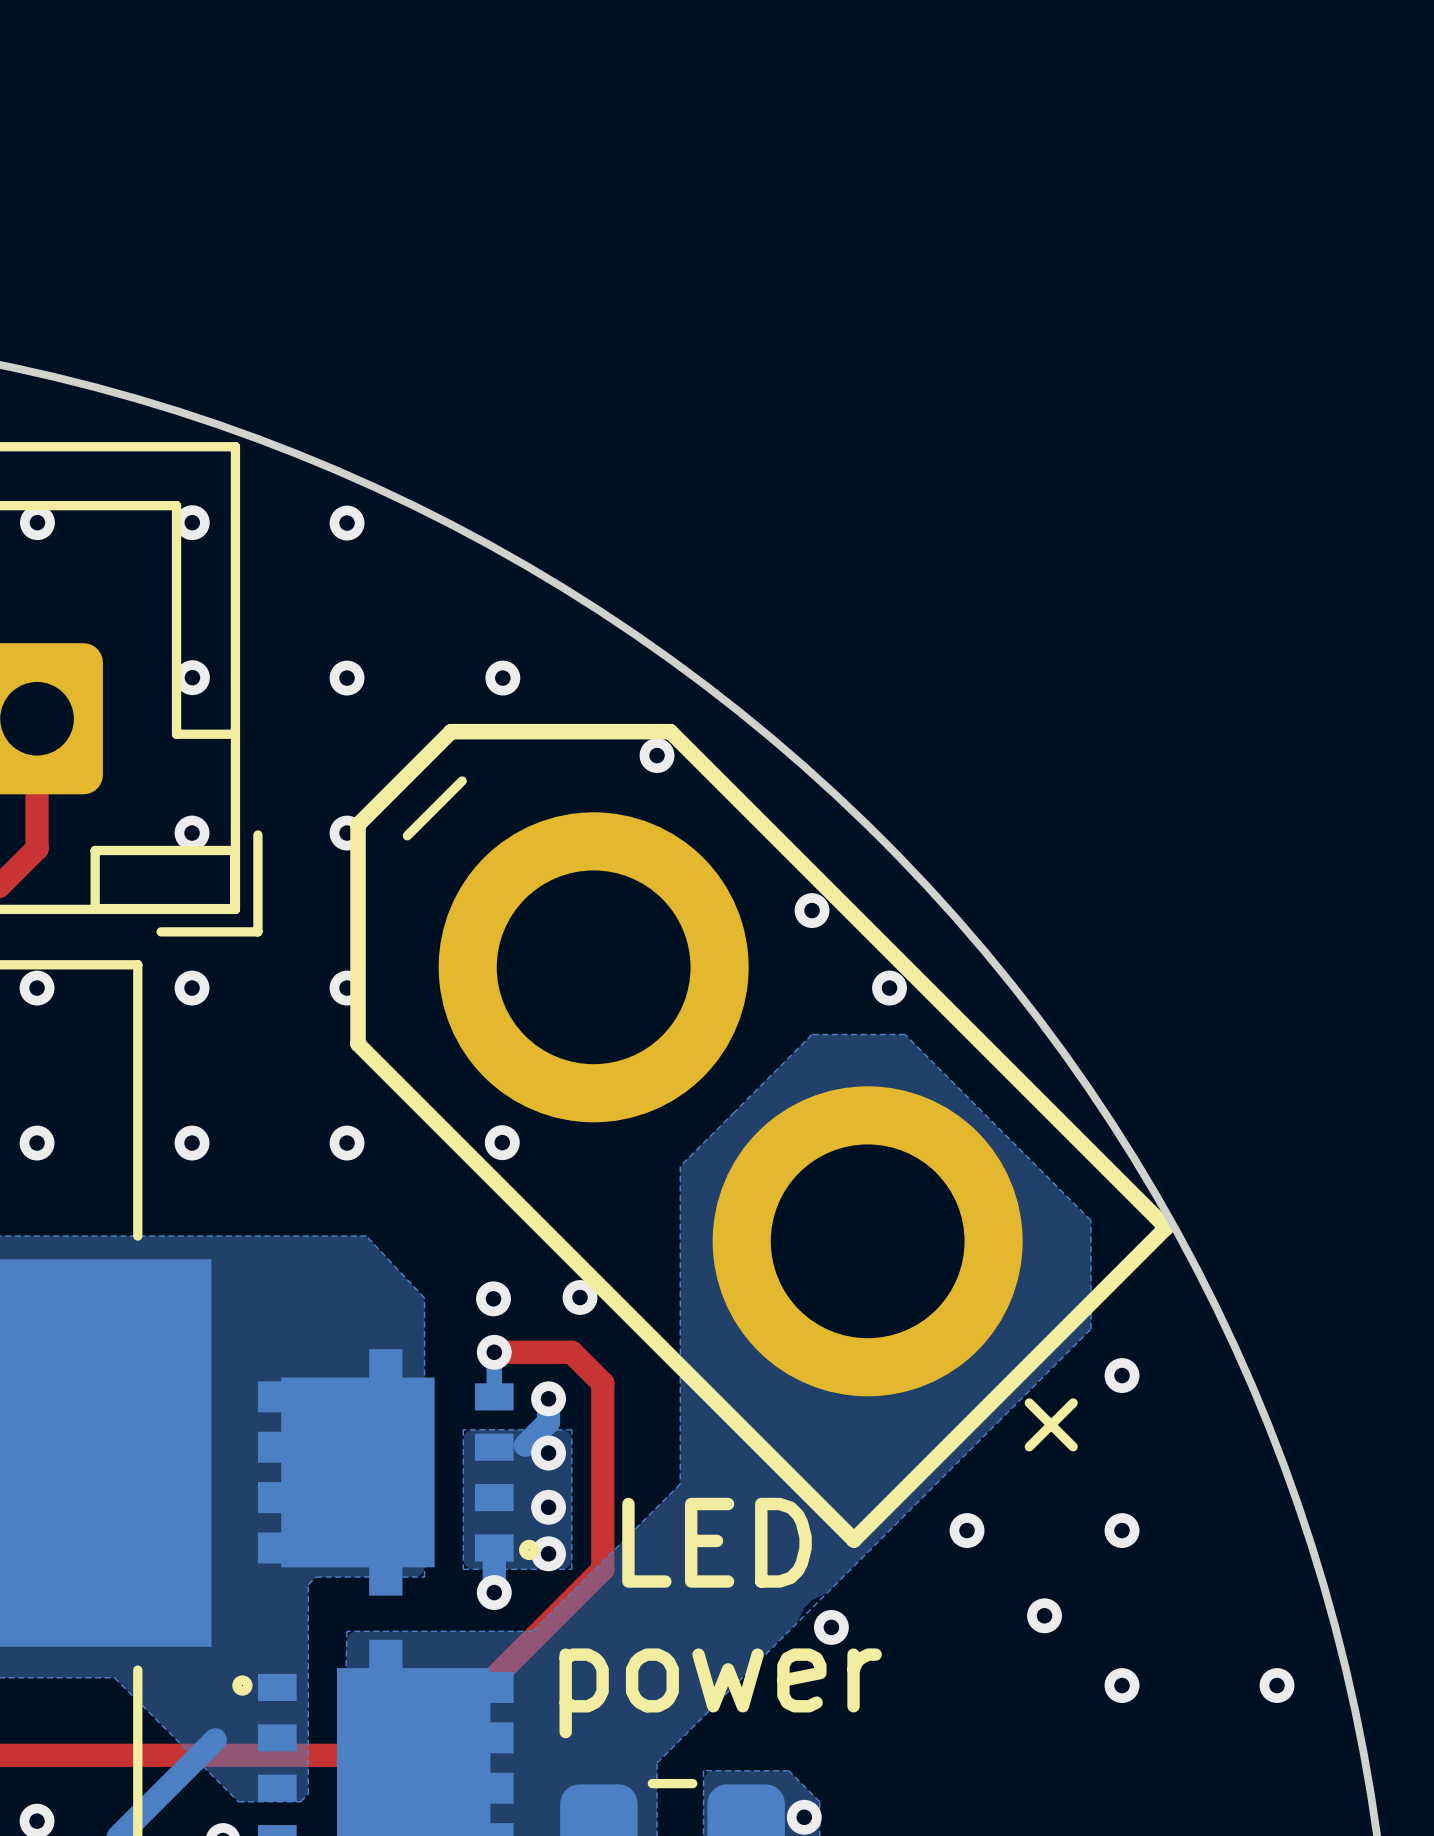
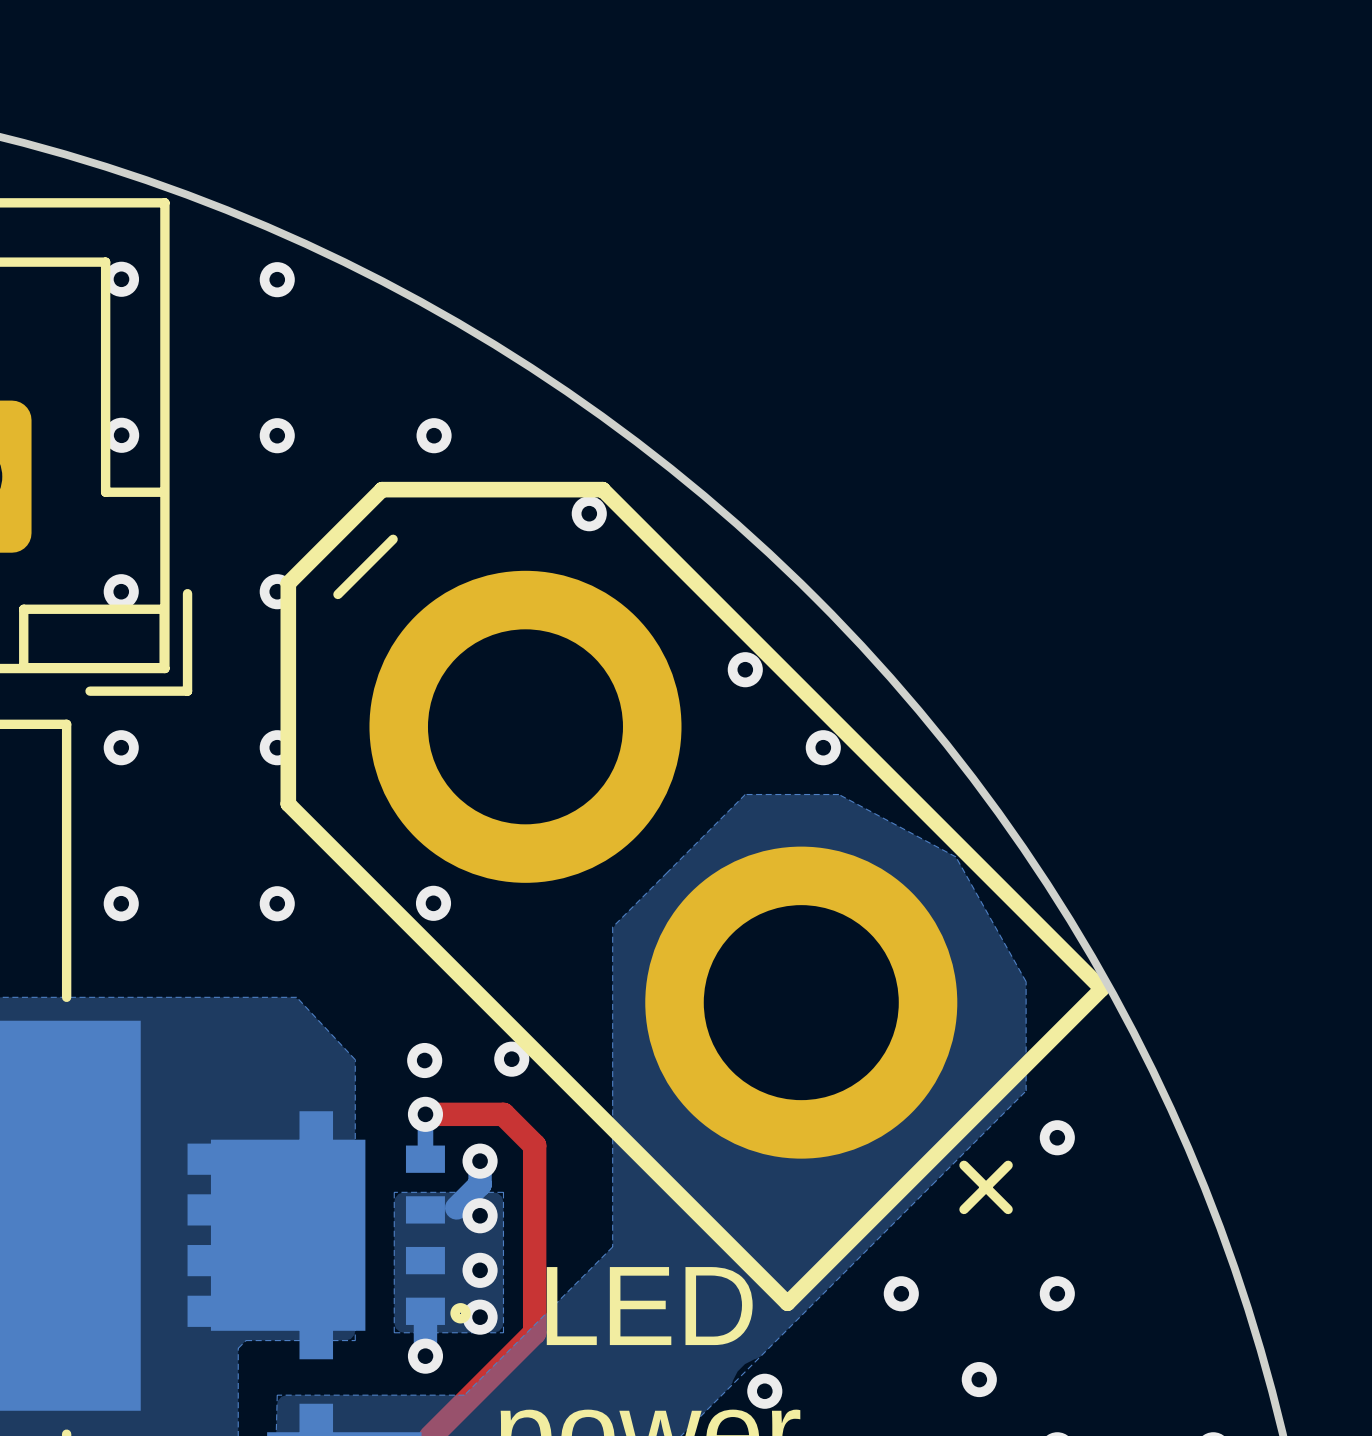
bottom zone outline: (905, 1034) (1091, 1220) -> (838, 794) (955, 856) (1026, 981)

